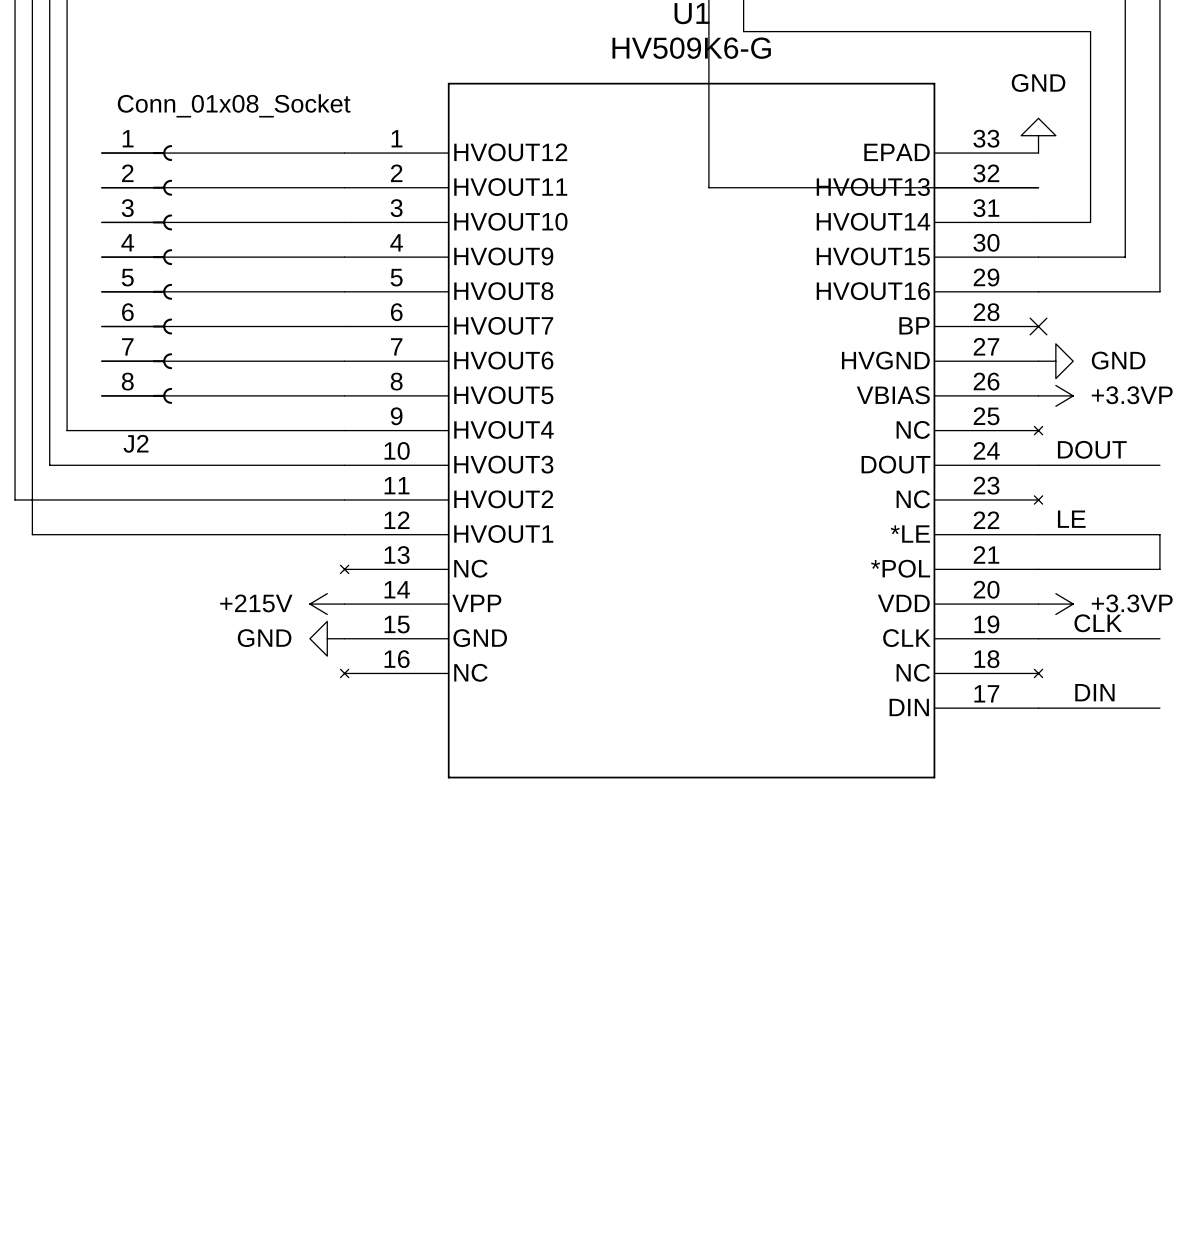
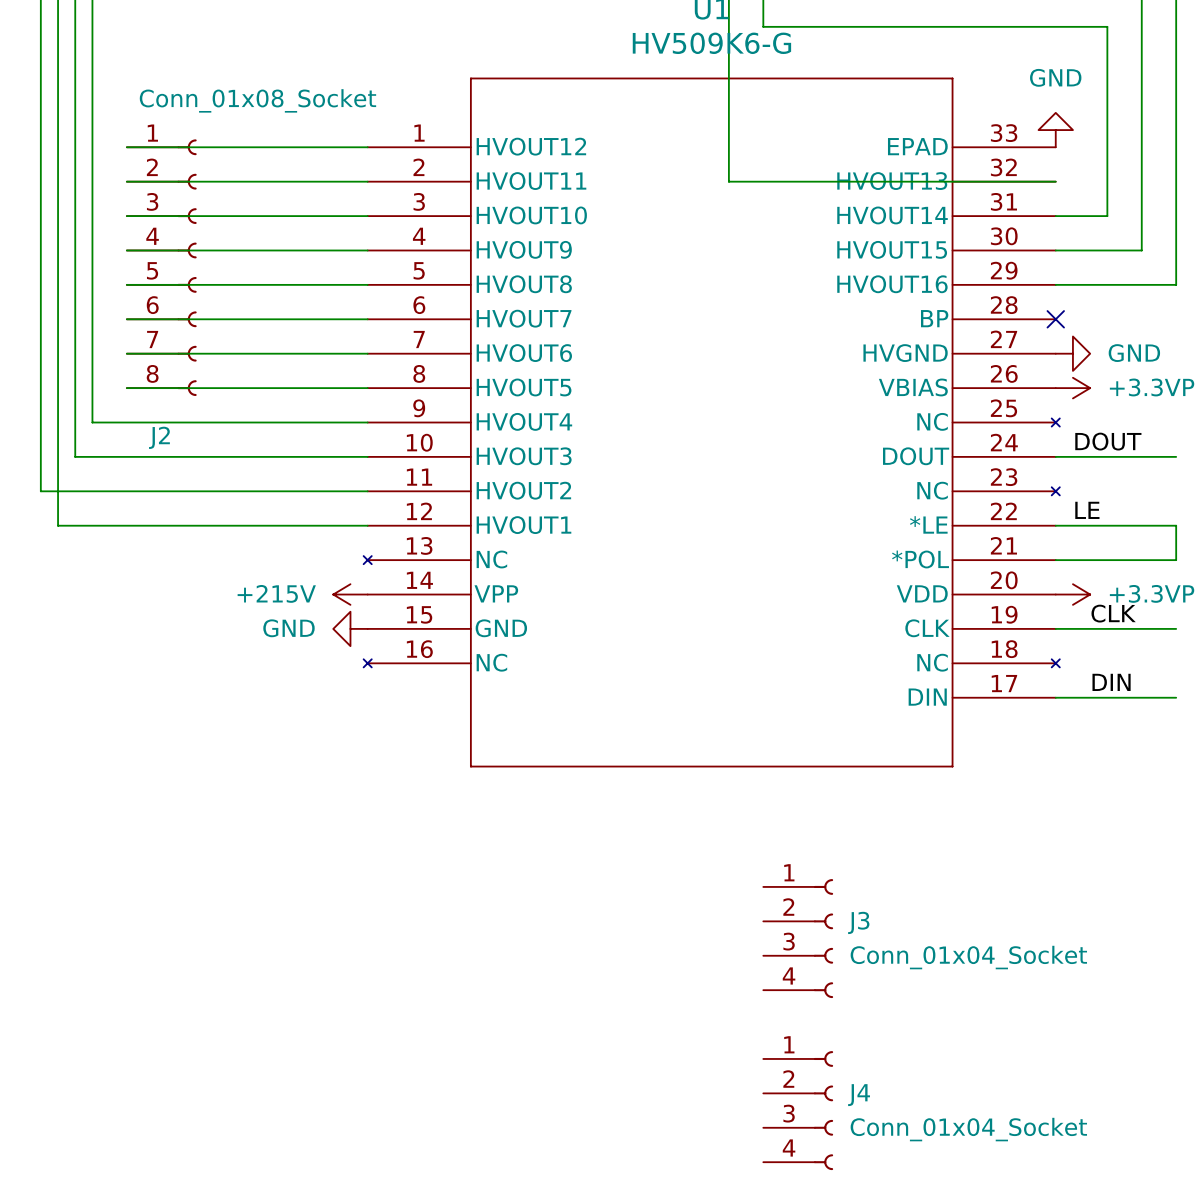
J3: none -> Conn_01x04_Socket (798, 938)
J4: none -> Conn_01x04_Socket (798, 1110)

